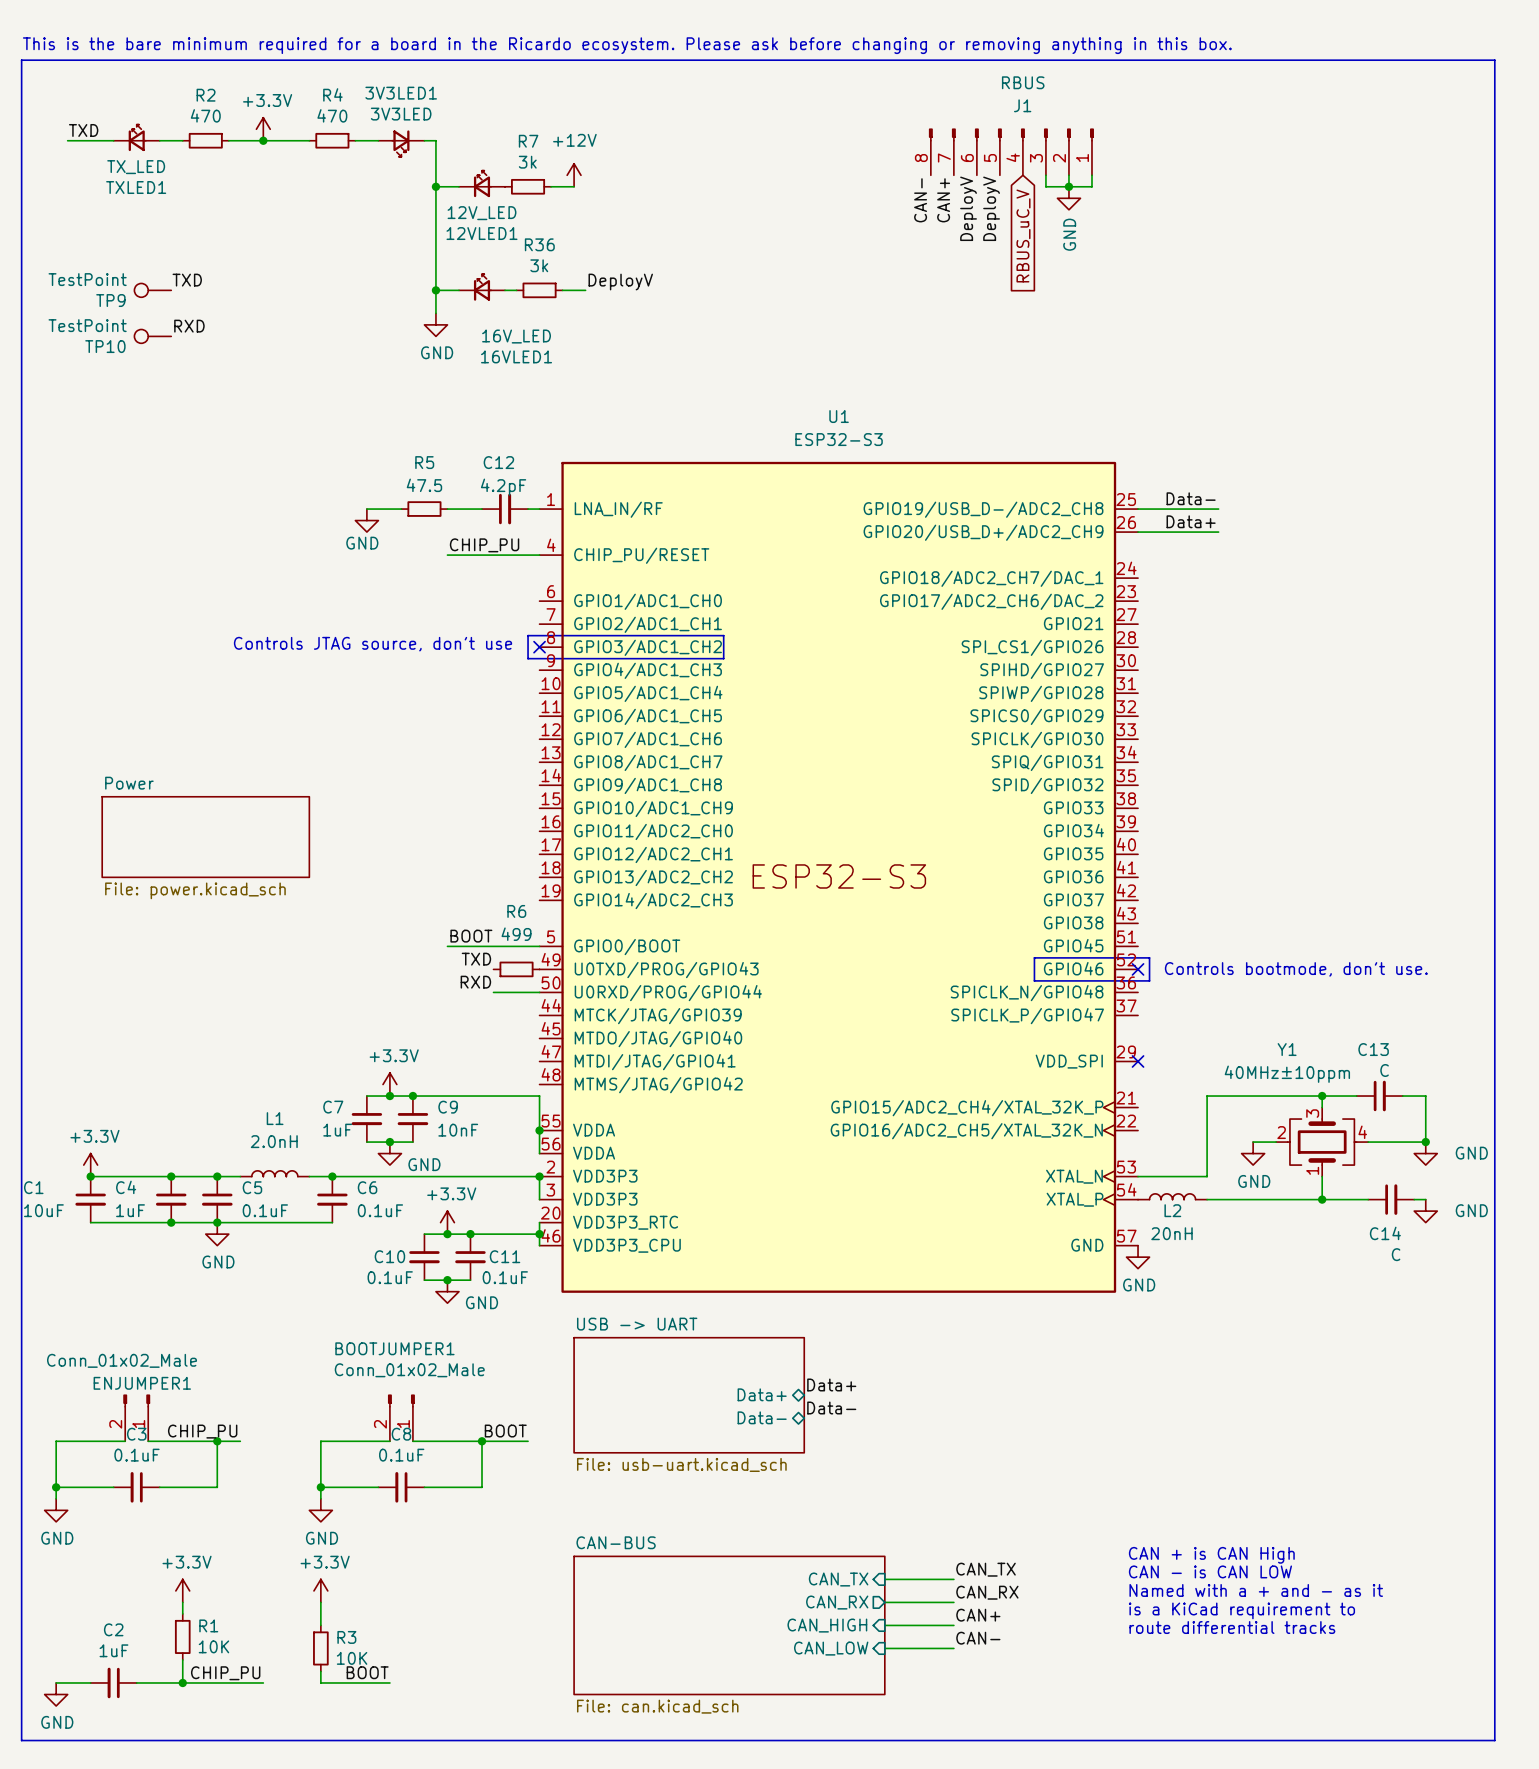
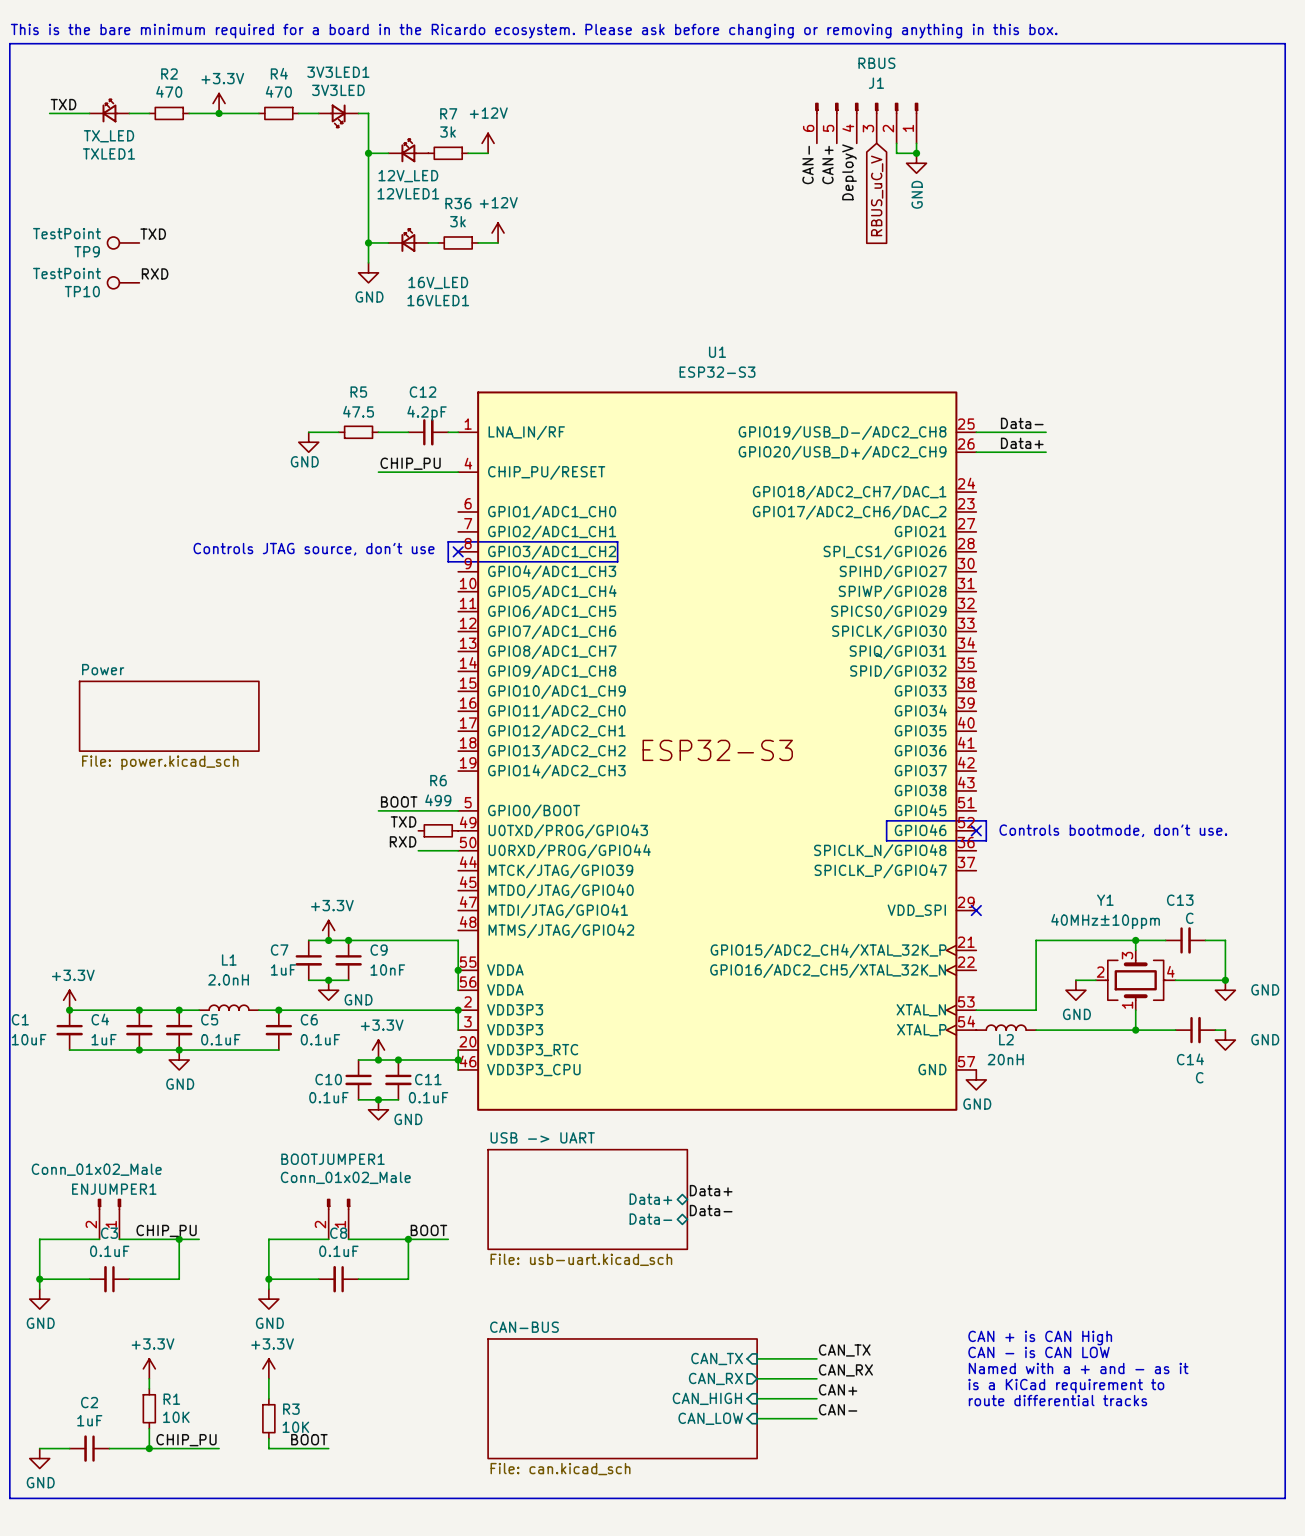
J1 symbol: [929, 128, 1094, 176] -> [815, 102, 919, 144]
wire: (1091, 175) (1091, 186) (1068, 186) -> none
label: CAN- (920, 200) -> none
label: CAN+ (943, 200) -> CAN- (808, 165)
label: DeployV (968, 208) -> CAN+ (827, 165)
power symbol: none -> +12V (498, 233)
label: DeployV (620, 282) -> none

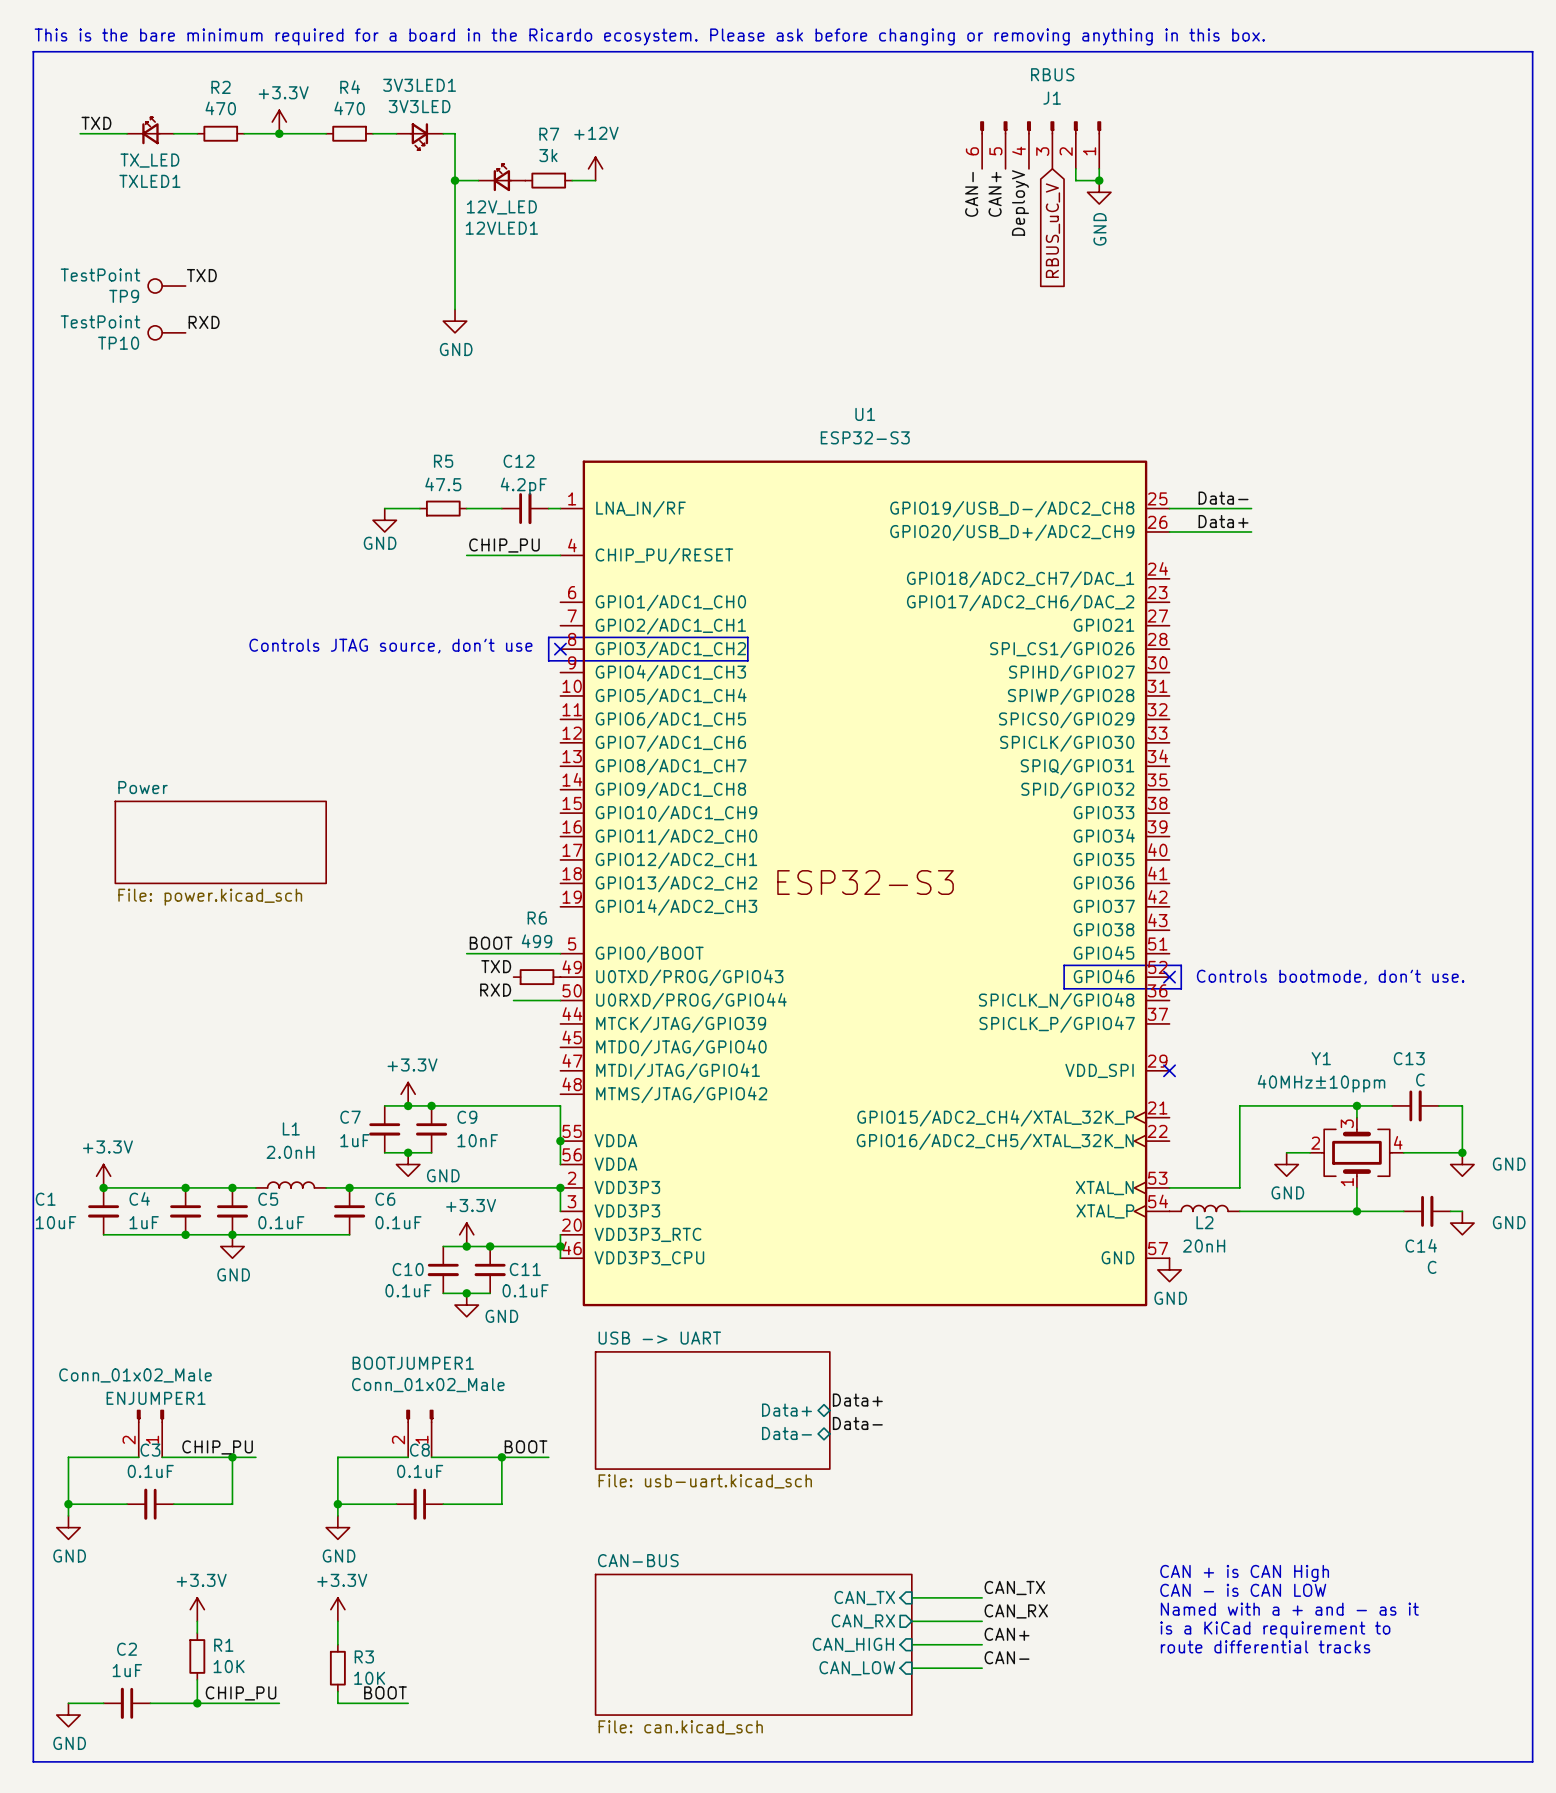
power symbol: +12V (498, 233) -> none
16VLED1: 16V_LED (408, 240) -> none
wire: (368, 242) (388, 242) -> none
junction: (368, 242) -> none
wire: (428, 242) (438, 242) -> none
R36: 3k (458, 242) -> none
wire: (478, 242) (498, 242) -> none

